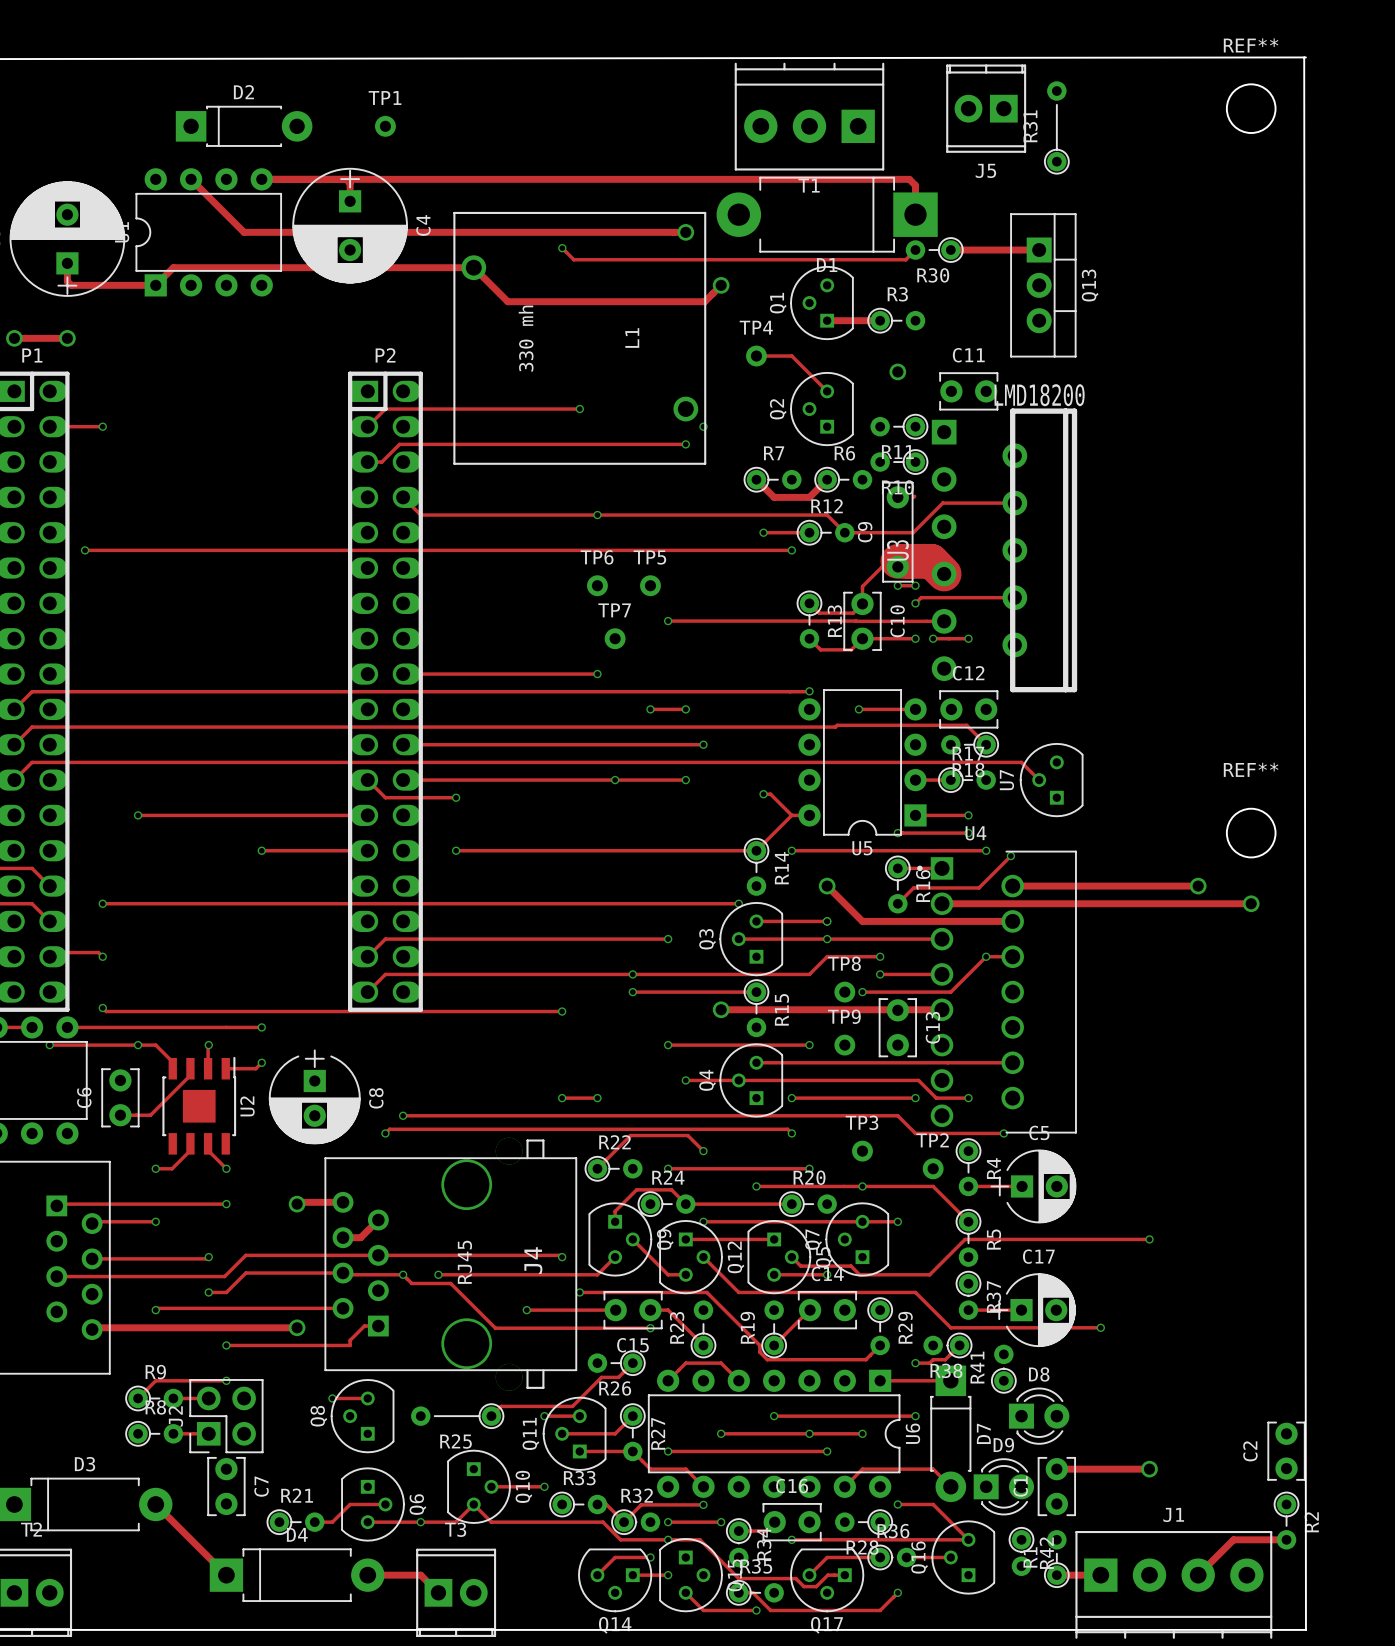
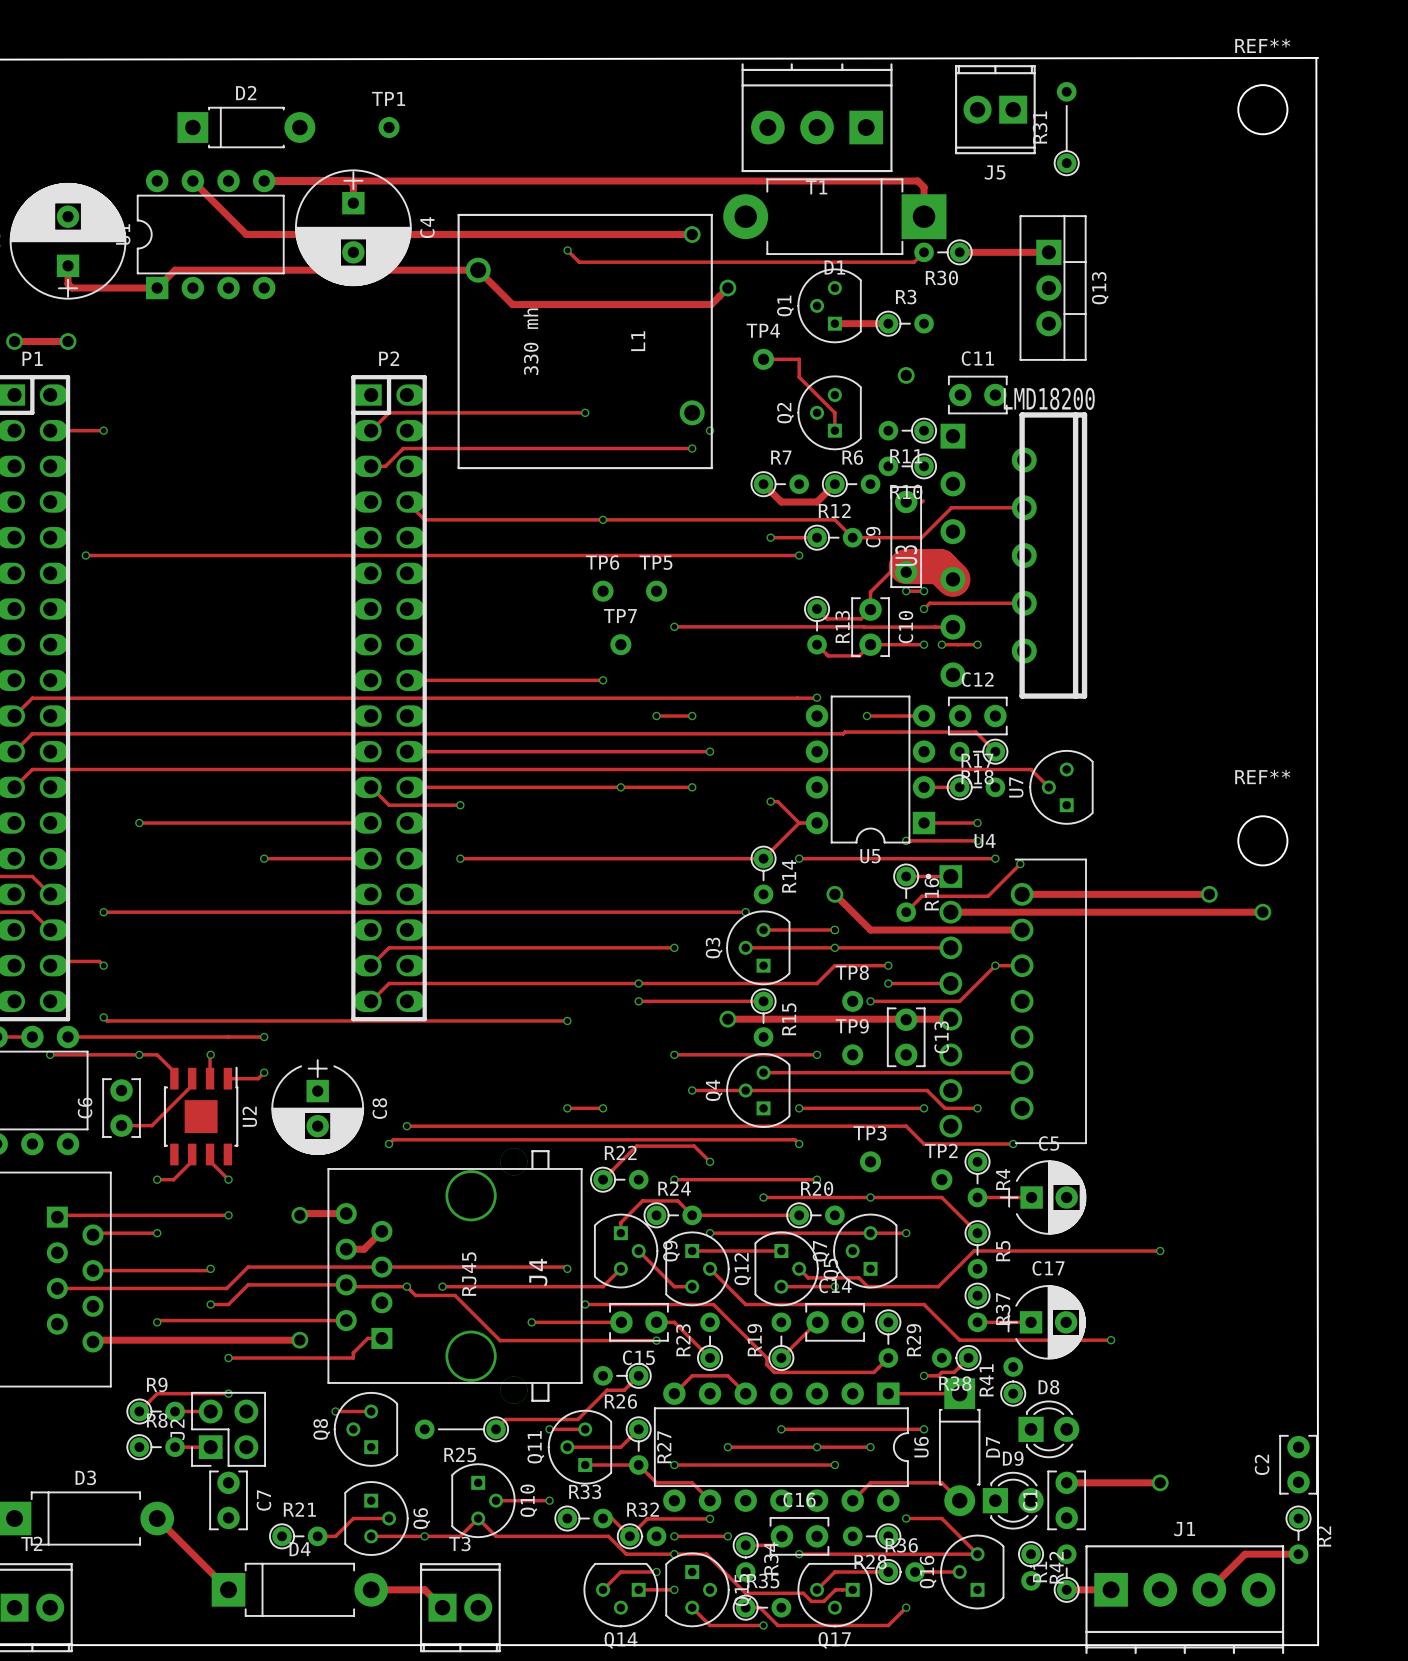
track: (791, 356) (827, 391) -> (799, 359) (799, 377) (834, 412) (834, 430)

